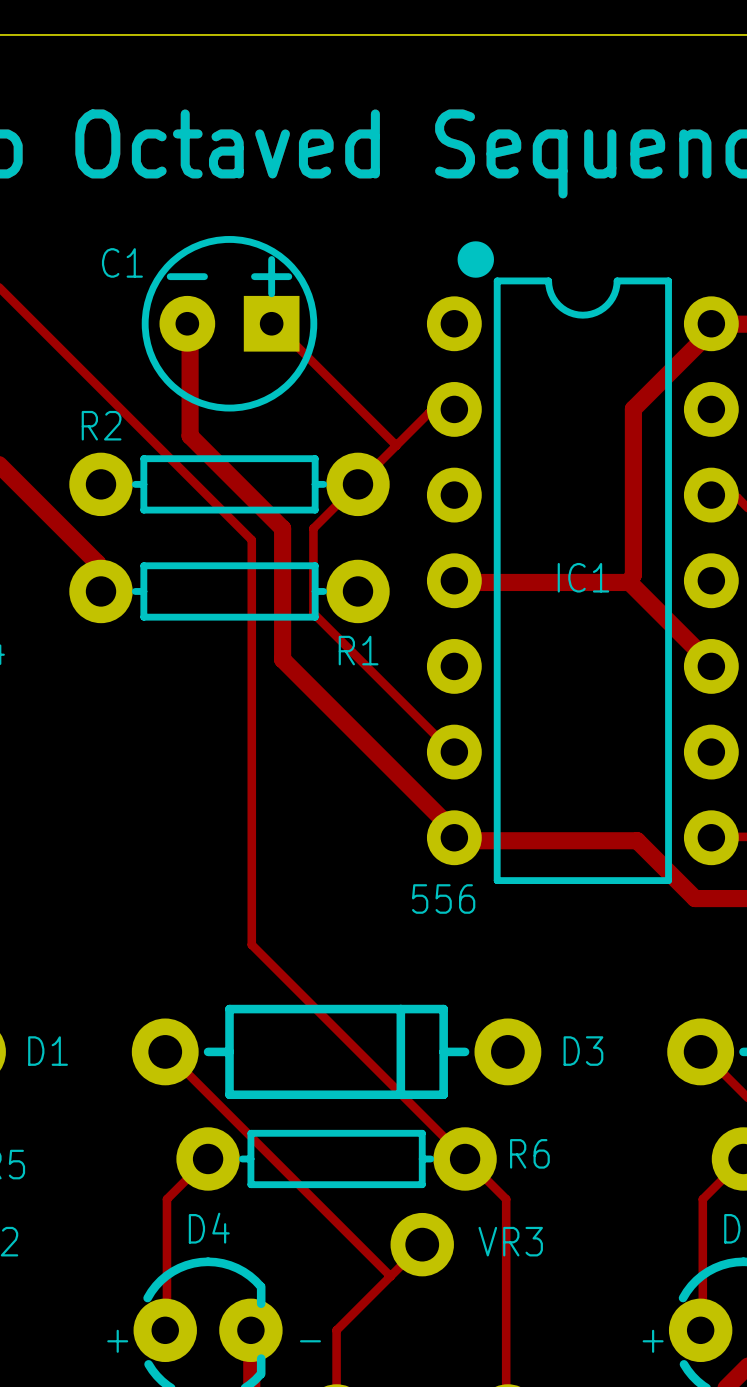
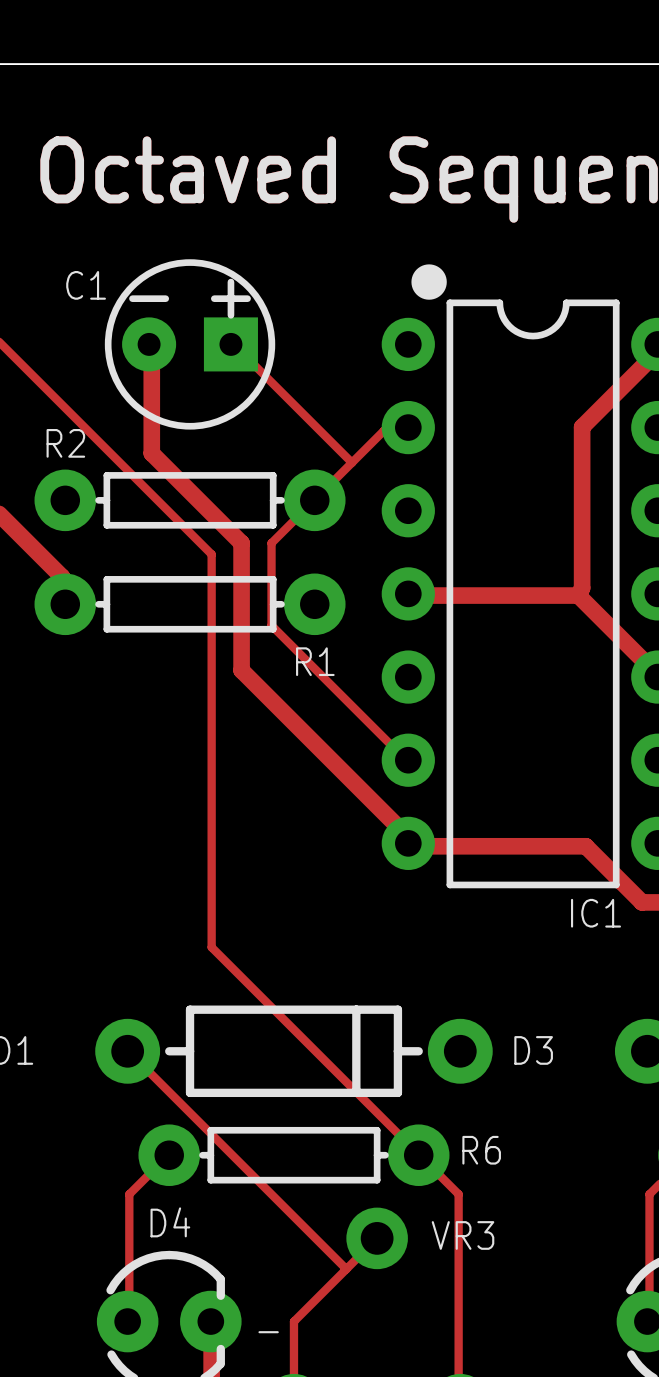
IC1 name position: IC1 (583, 577) -> IC1 (596, 913)
IC1 value: 556 (443, 899) -> none
text: + (117, 1341) -> none
text: + (653, 1341) -> none

